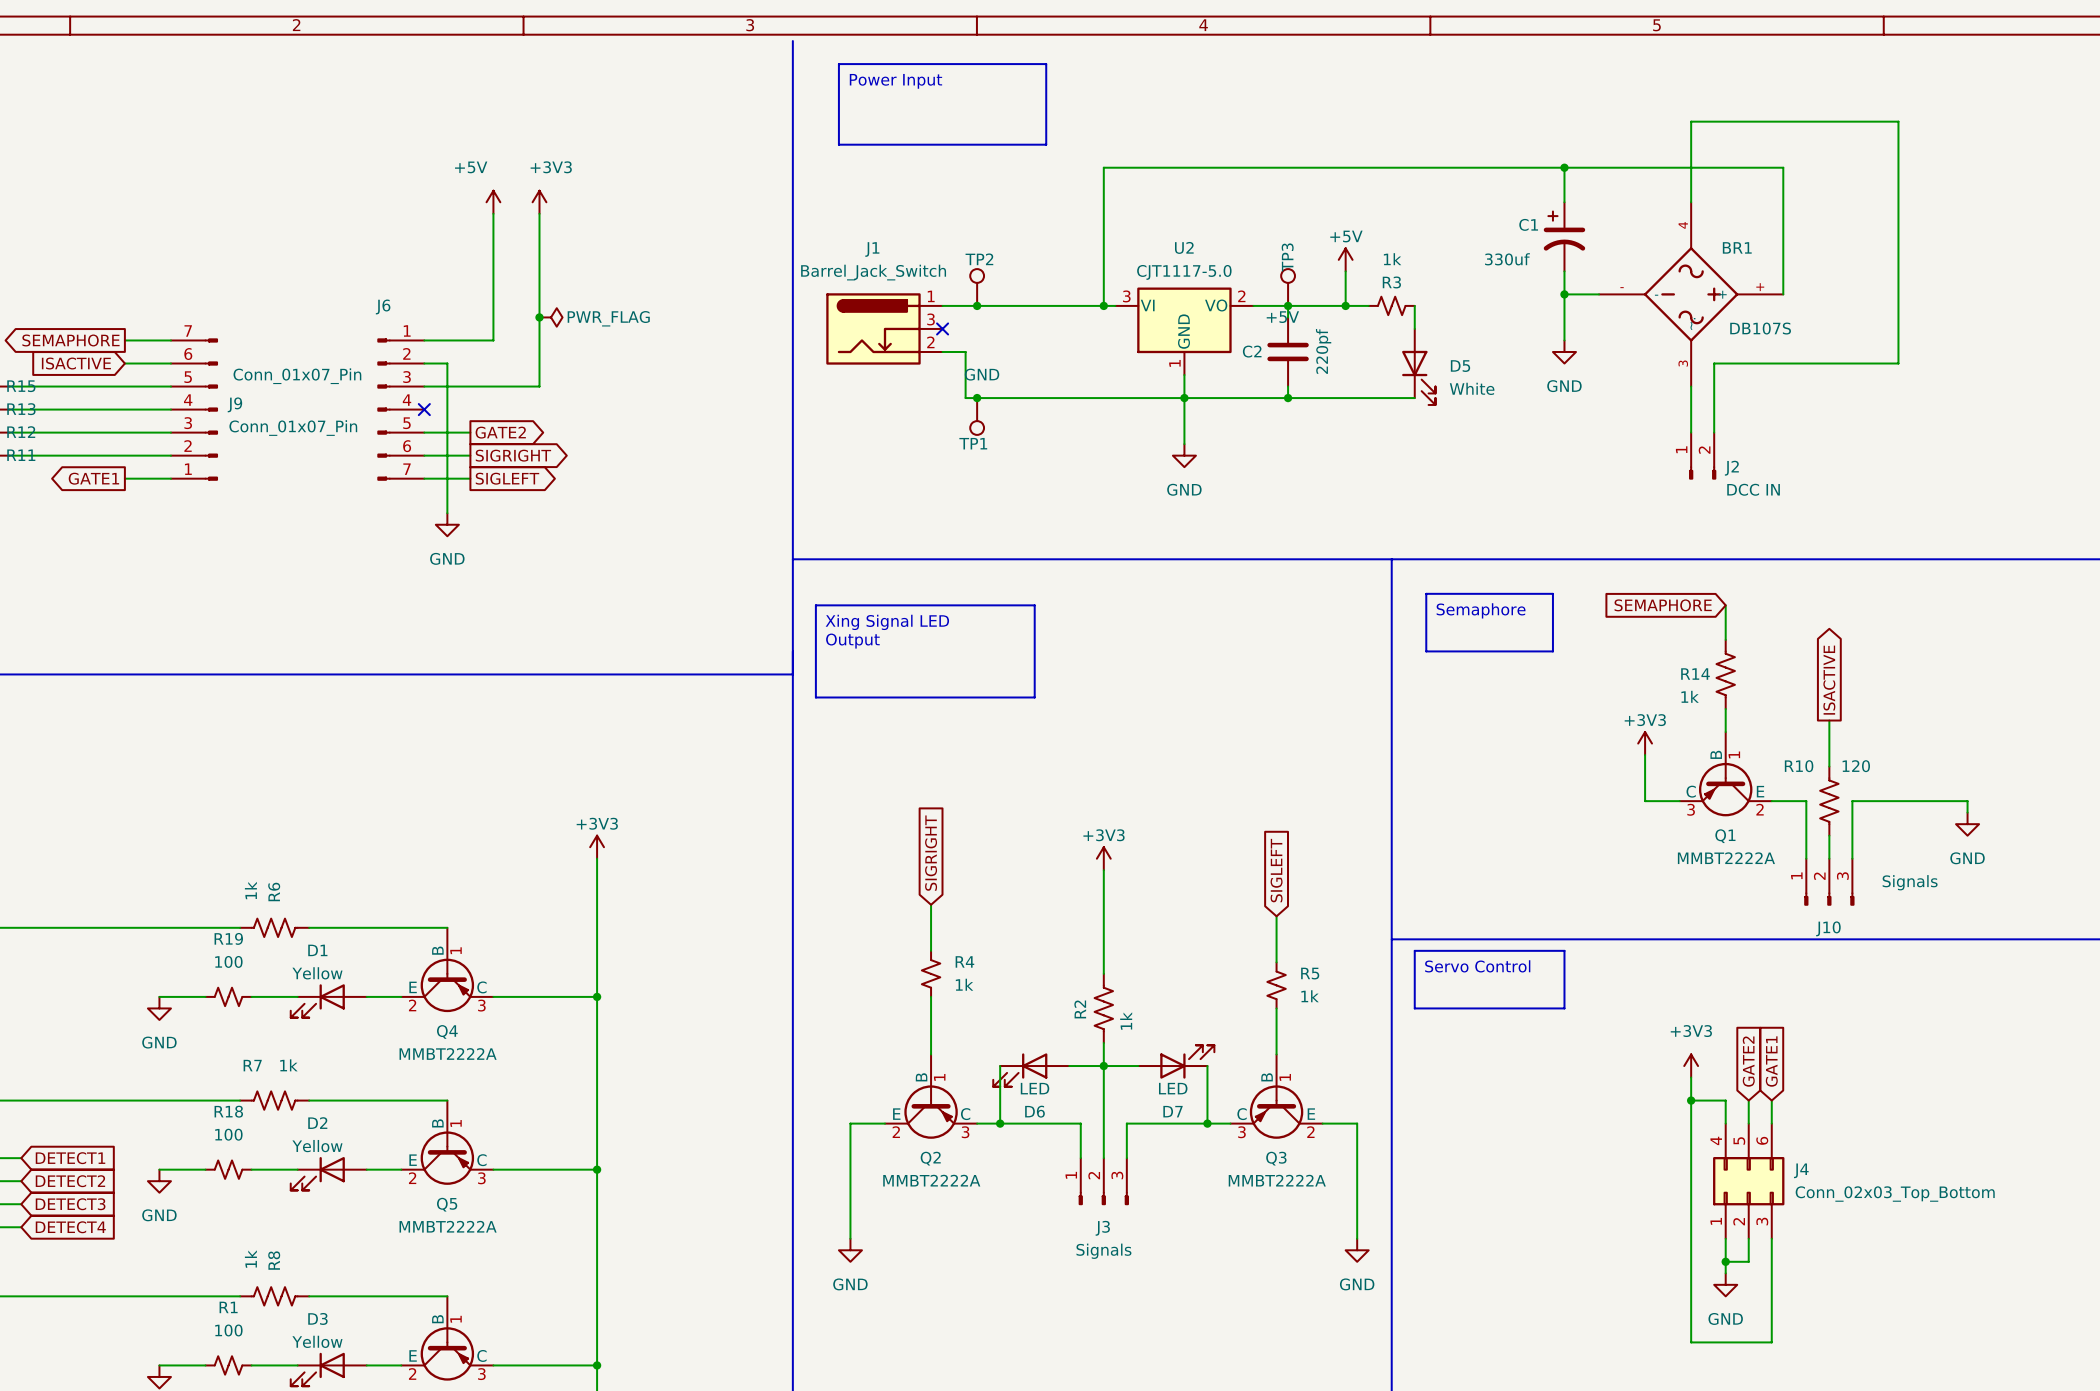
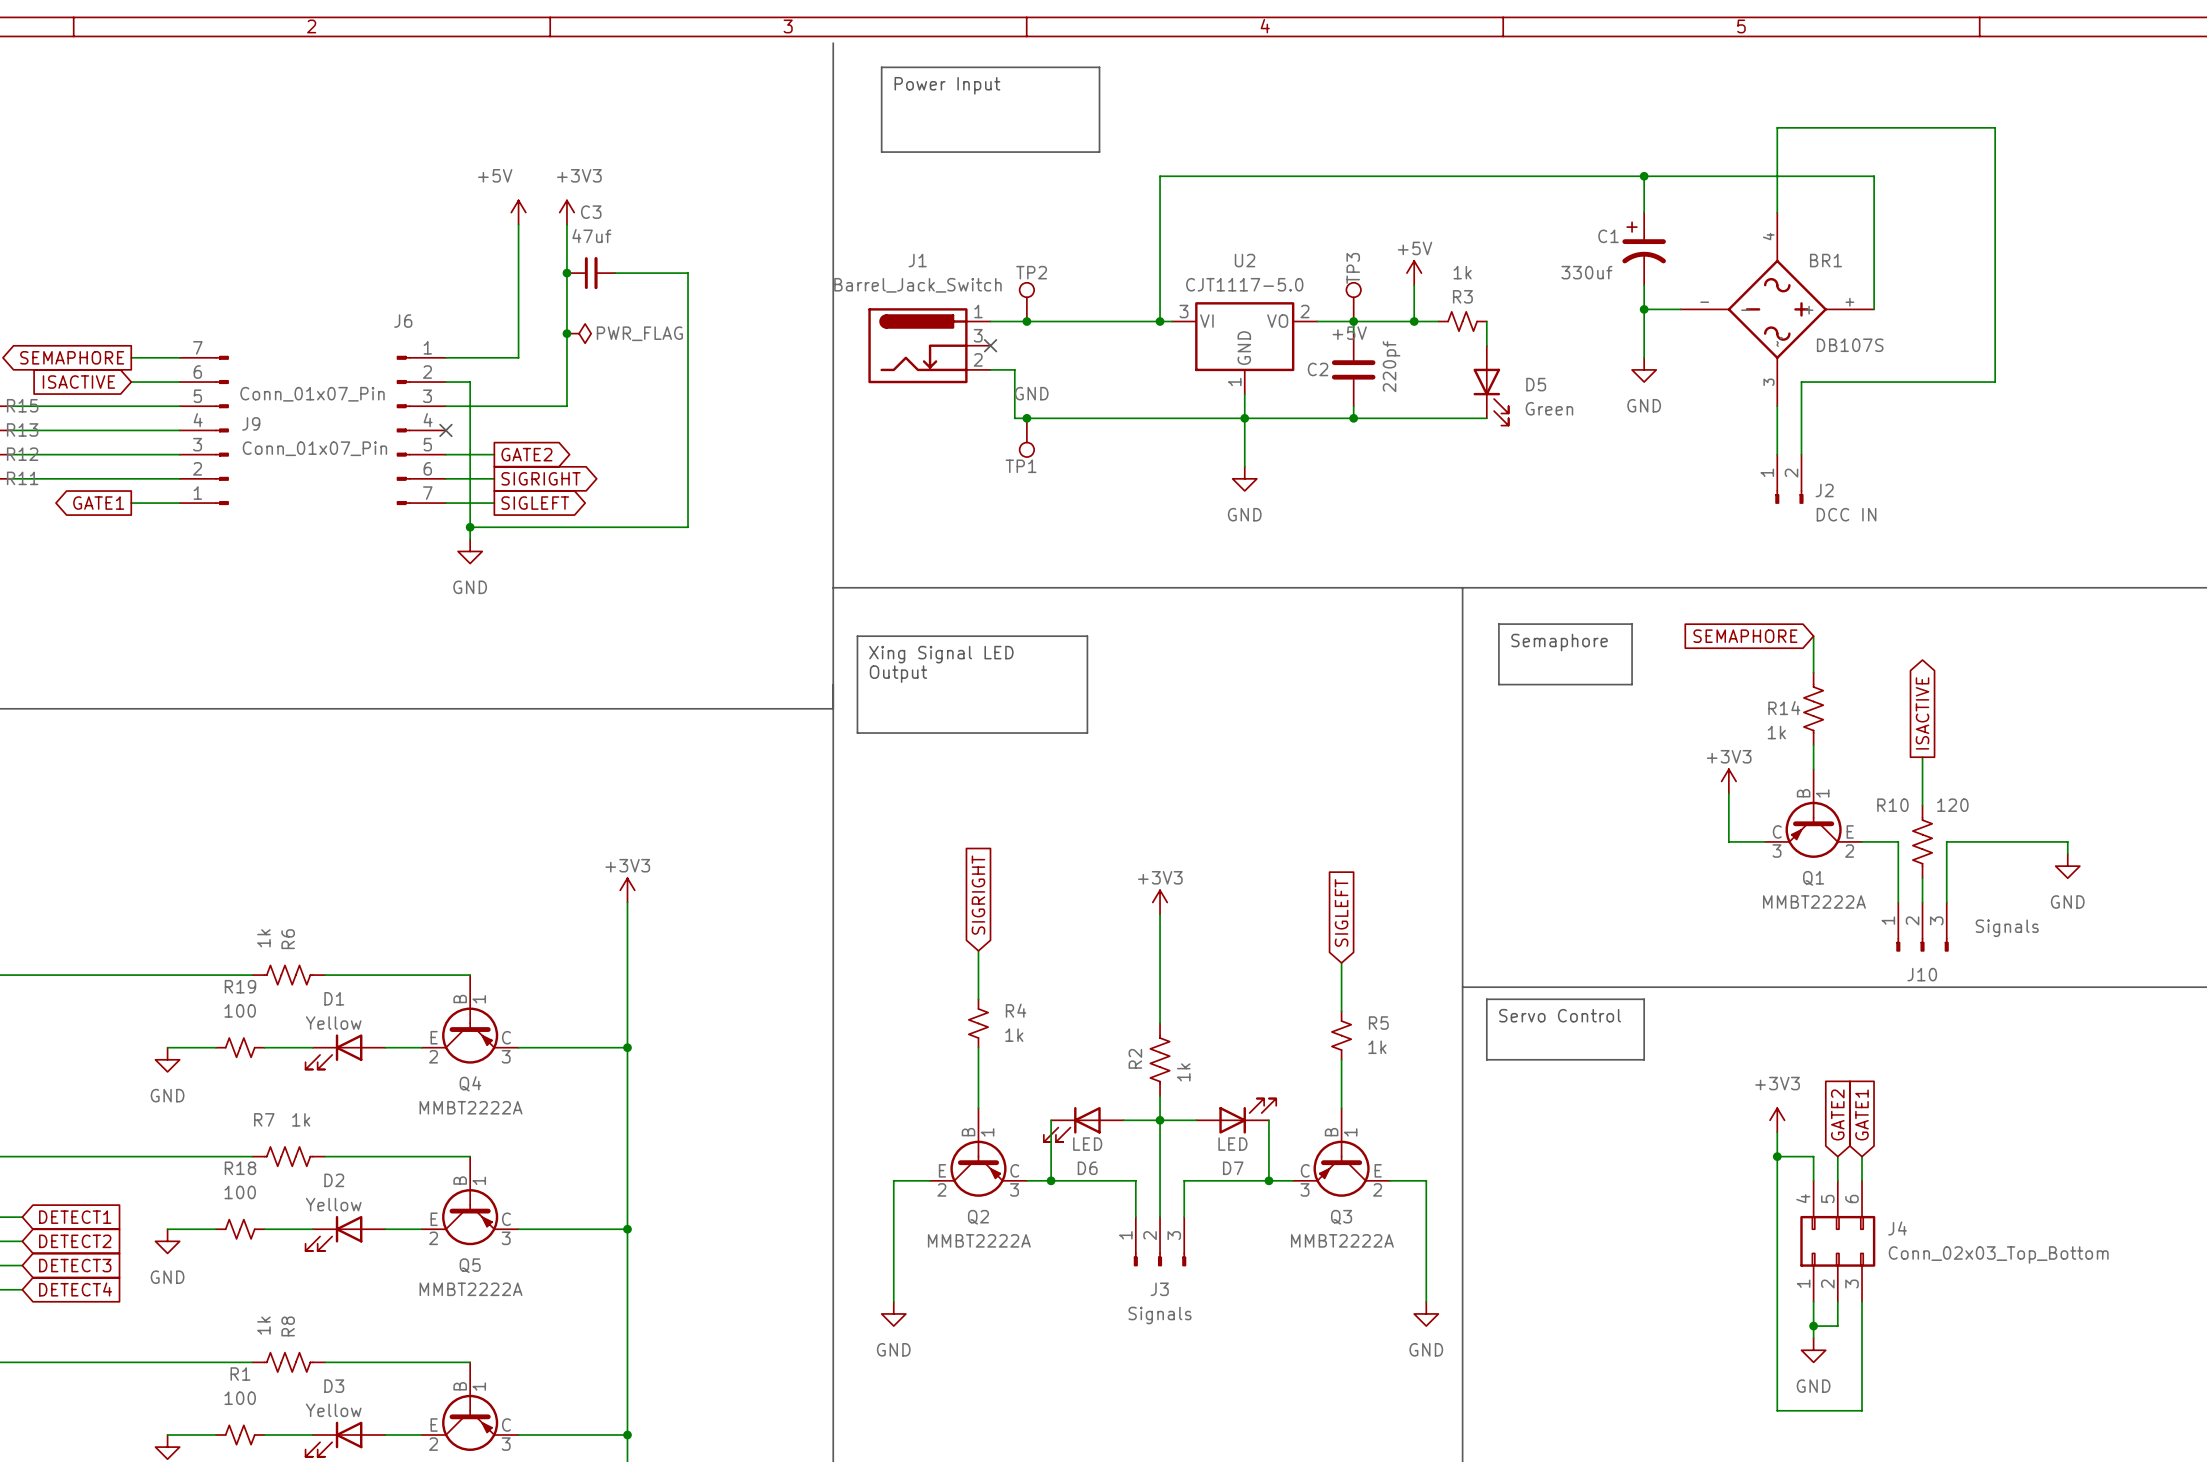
junction: none -> (566, 273)
C3: none -> 47uf (591, 273)
wire: none -> (615, 273) (688, 273) (688, 527) (470, 527)
D5 value: White (1472, 388) -> Green (1549, 408)
junction: none -> (470, 527)

